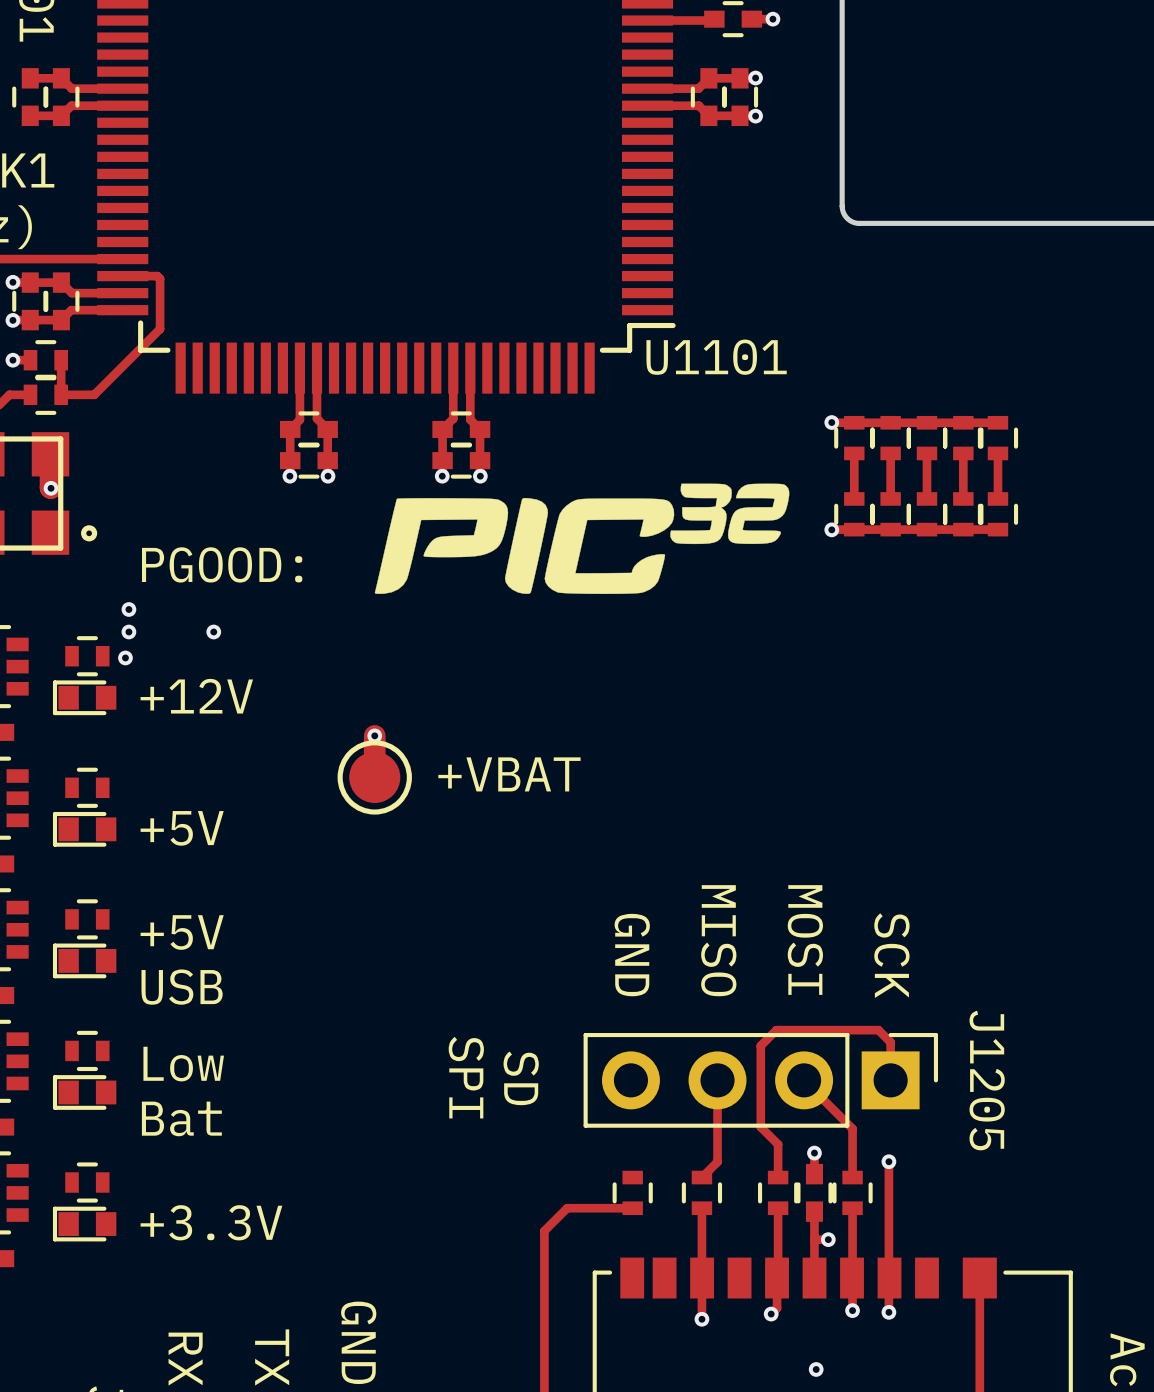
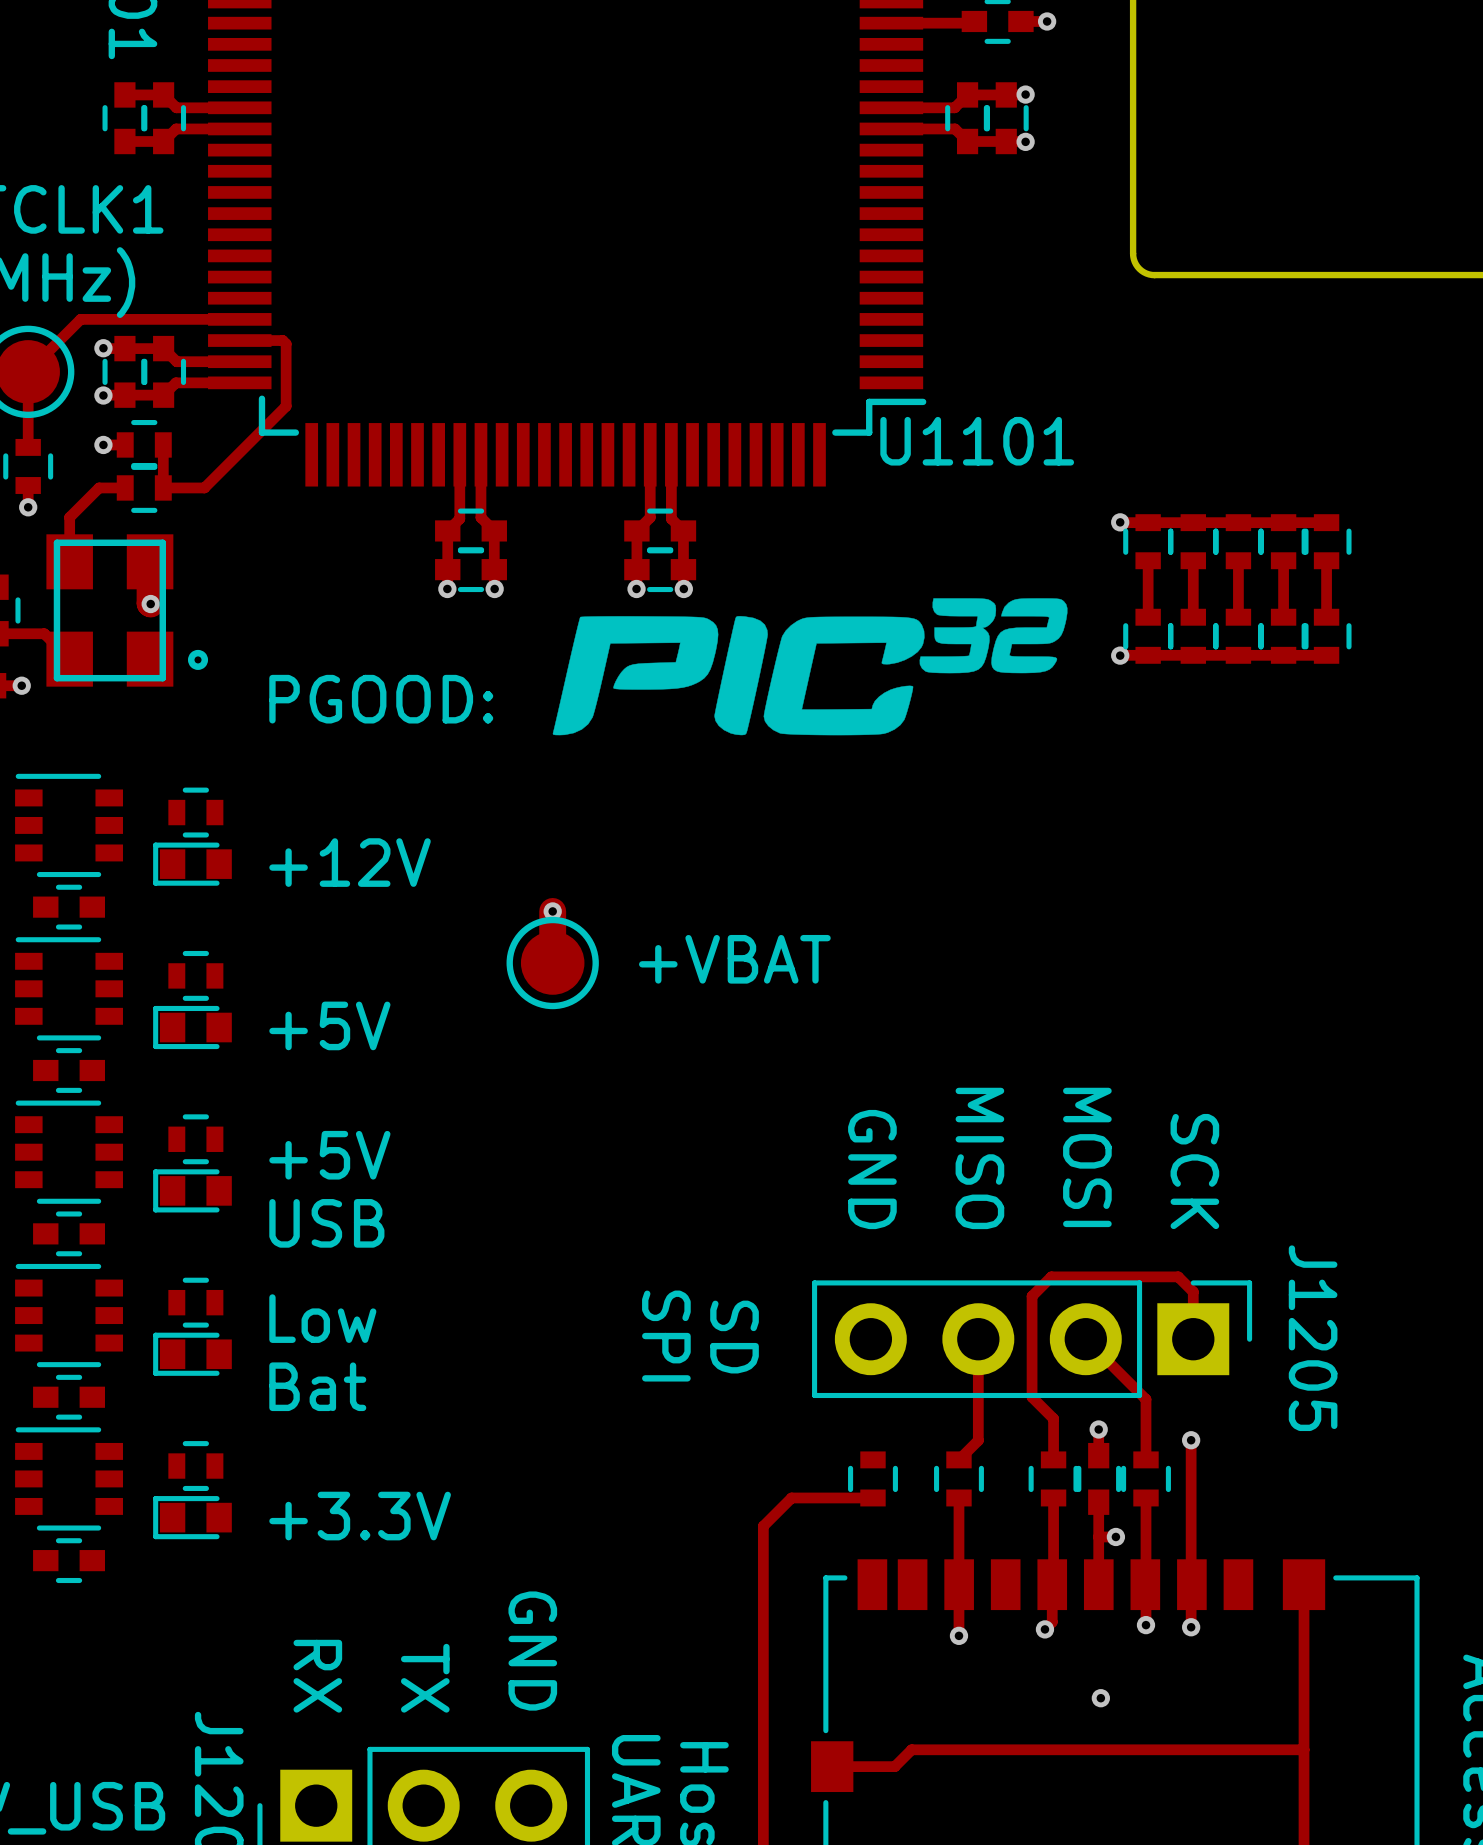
via: (128, 609) -> none
via: (128, 631) -> none
via: (213, 631) -> none
via: (125, 657) -> none

